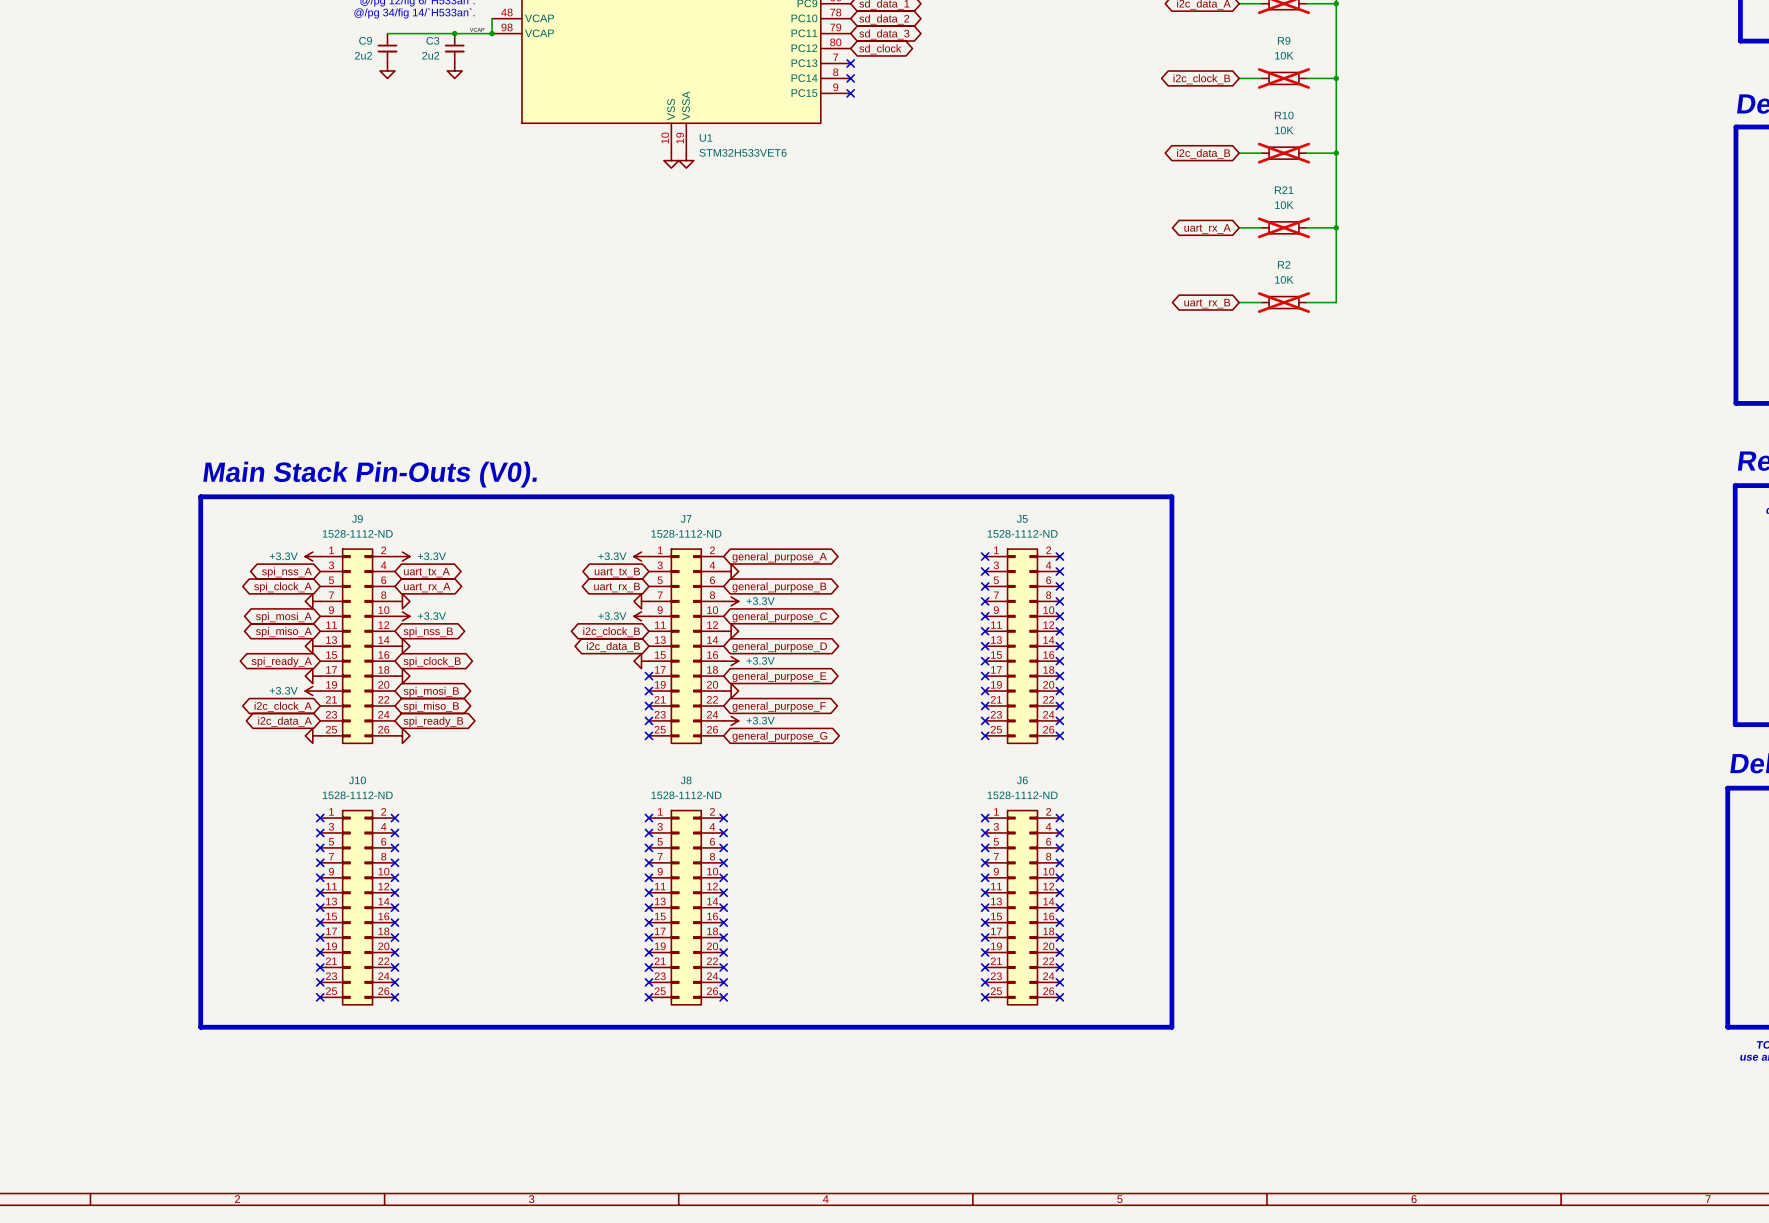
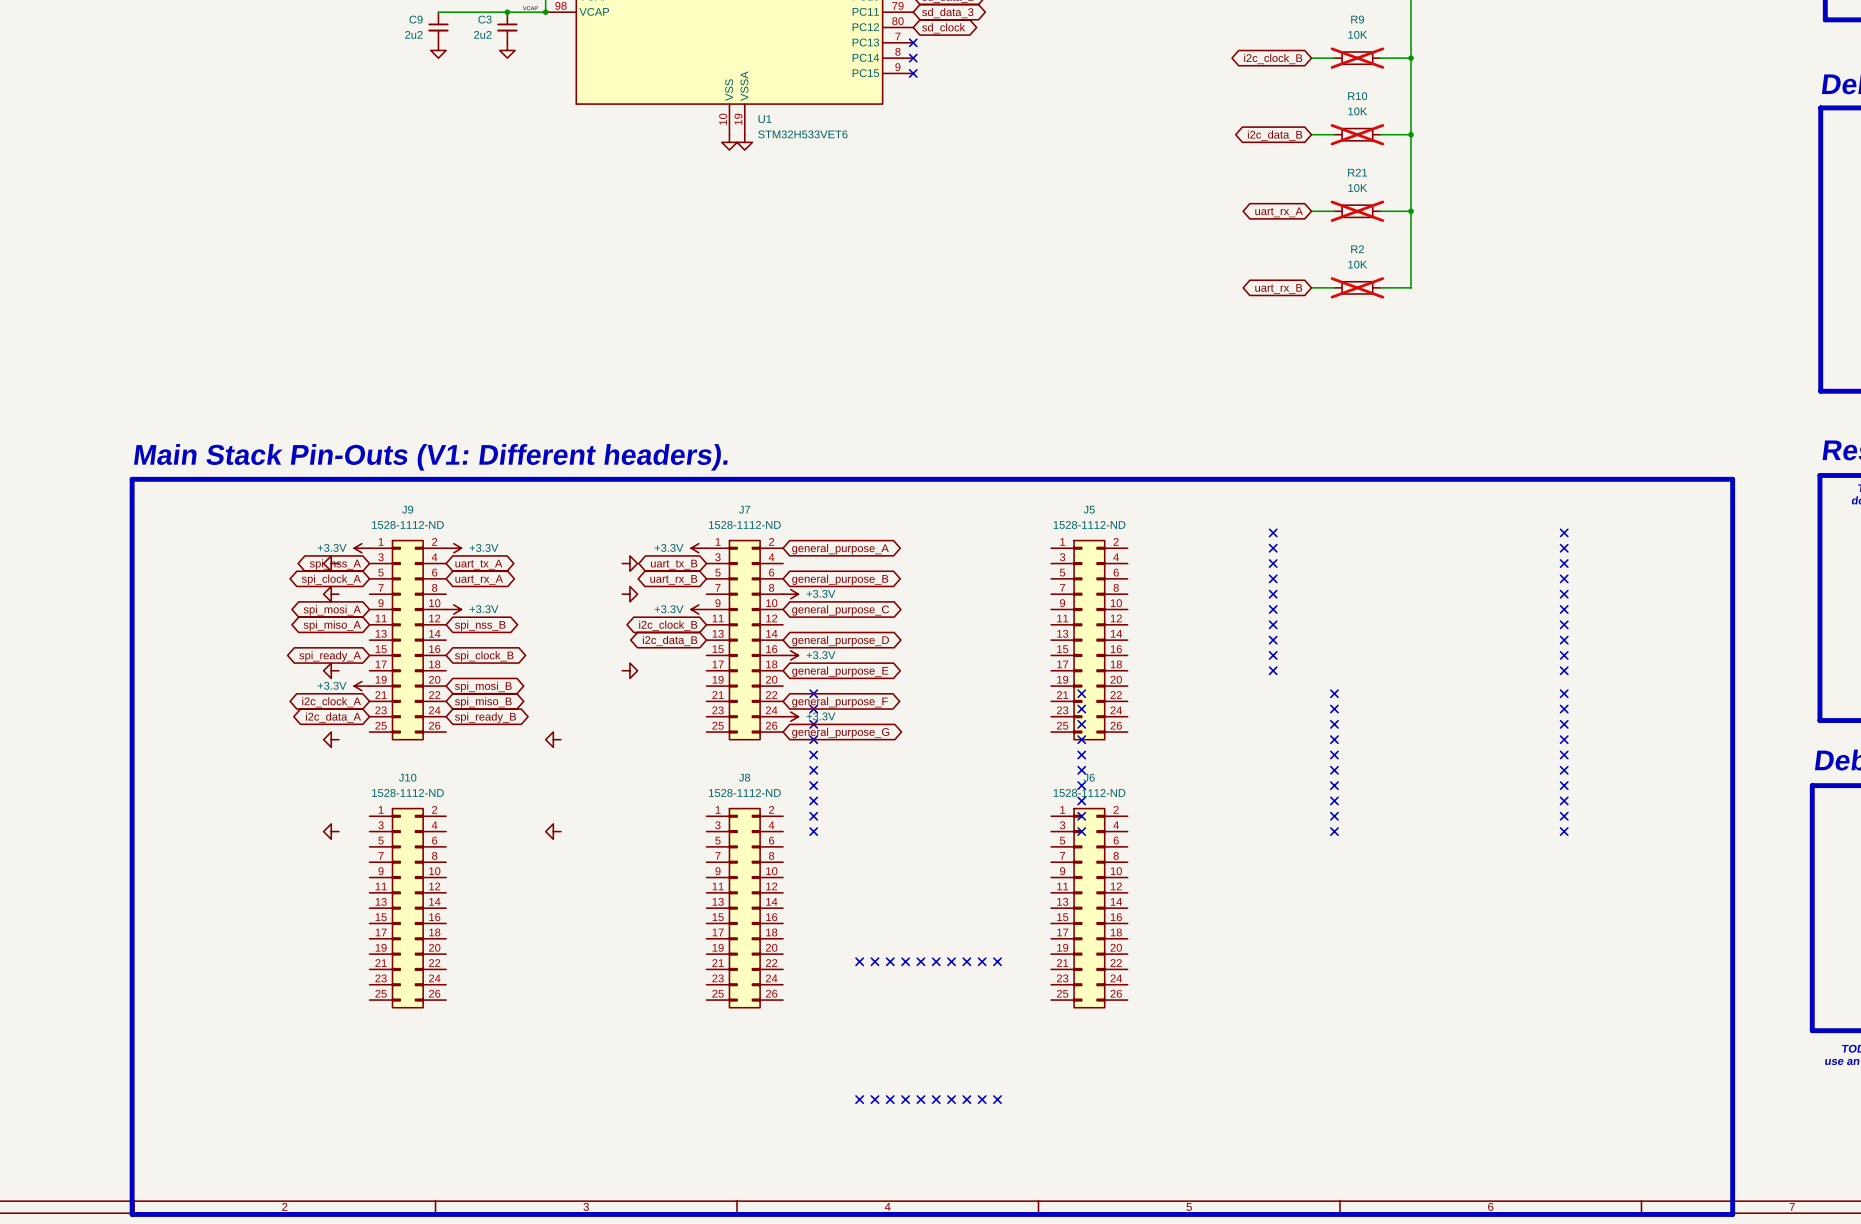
text: Main Stack Pin-Outs (V0). (370, 474) -> Main Stack Pin-Outs (V1: Different headers). (430, 457)
line: none -> (132, 479) (1732, 479) (1732, 1214) (132, 1214) (132, 479)
line: (200, 496) (1171, 496) (1171, 1027) (200, 1027) (200, 496) -> none
no-connect mark: none -> (1273, 532)
no-connect mark: none -> (1564, 532)
no-connect mark: (985, 556) -> none
no-connect mark: (1059, 556) -> none
no-connect mark: none -> (1273, 548)
no-connect mark: none -> (1564, 548)
power symbol: none -> (331, 563)
power symbol: none -> (629, 563)
power symbol: (731, 571) -> none
no-connect mark: (985, 571) -> none
no-connect mark: (1059, 571) -> none
no-connect mark: none -> (1273, 563)
no-connect mark: none -> (1564, 563)
no-connect mark: (985, 586) -> none
no-connect mark: (1059, 586) -> none
no-connect mark: none -> (1273, 578)
no-connect mark: none -> (1564, 578)
power symbol: none -> (331, 594)
power symbol: (312, 601) -> none
power symbol: (402, 601) -> none
power symbol: none -> (629, 594)
power symbol: (641, 601) -> none
no-connect mark: (985, 601) -> none
no-connect mark: (1059, 601) -> none
no-connect mark: none -> (1273, 594)
no-connect mark: none -> (1564, 594)
no-connect mark: (985, 616) -> none
no-connect mark: (1059, 616) -> none
no-connect mark: none -> (1273, 609)
no-connect mark: none -> (1564, 609)
power symbol: (731, 631) -> none
no-connect mark: (985, 631) -> none
no-connect mark: (1059, 631) -> none
no-connect mark: none -> (1273, 624)
no-connect mark: none -> (1564, 624)
power symbol: (312, 646) -> none
power symbol: (402, 646) -> none
no-connect mark: (985, 646) -> none
no-connect mark: (1059, 646) -> none
no-connect mark: none -> (1273, 640)
no-connect mark: none -> (1564, 640)
power symbol: (641, 661) -> none
no-connect mark: (985, 661) -> none
no-connect mark: (1059, 661) -> none
no-connect mark: none -> (1273, 655)
no-connect mark: none -> (1564, 655)
power symbol: none -> (331, 670)
power symbol: (312, 676) -> none
power symbol: (402, 676) -> none
power symbol: none -> (629, 670)
no-connect mark: (648, 676) -> none
no-connect mark: (985, 676) -> none
no-connect mark: (1059, 676) -> none
no-connect mark: none -> (1273, 670)
no-connect mark: none -> (1564, 670)
no-connect mark: (648, 691) -> none
power symbol: (731, 691) -> none
no-connect mark: (985, 691) -> none
no-connect mark: (1059, 691) -> none
no-connect mark: none -> (813, 693)
no-connect mark: none -> (1081, 693)
no-connect mark: none -> (1334, 693)
no-connect mark: none -> (1564, 693)
no-connect mark: (648, 705) -> none
no-connect mark: (985, 705) -> none
no-connect mark: (1059, 705) -> none
no-connect mark: none -> (813, 709)
no-connect mark: none -> (1081, 709)
no-connect mark: none -> (1334, 709)
no-connect mark: none -> (1564, 709)
no-connect mark: (648, 720) -> none
no-connect mark: (985, 720) -> none
no-connect mark: (1059, 720) -> none
no-connect mark: none -> (813, 724)
no-connect mark: none -> (1081, 724)
no-connect mark: none -> (1334, 724)
no-connect mark: none -> (1564, 724)
power symbol position: (312, 735) -> (331, 739)
power symbol: (402, 735) -> none
no-connect mark: (648, 735) -> none
no-connect mark: (985, 735) -> none
no-connect mark: (1059, 735) -> none
power symbol: none -> (553, 739)
no-connect mark: none -> (813, 739)
no-connect mark: none -> (1081, 739)
no-connect mark: none -> (1334, 739)
no-connect mark: none -> (1564, 739)
no-connect mark: none -> (813, 754)
no-connect mark: none -> (1081, 754)
no-connect mark: none -> (1334, 754)
no-connect mark: none -> (1564, 754)
no-connect mark: none -> (813, 770)
no-connect mark: none -> (1081, 770)
no-connect mark: none -> (1334, 770)
no-connect mark: none -> (1564, 770)
no-connect mark: none -> (813, 785)
no-connect mark: none -> (1081, 785)
no-connect mark: none -> (1334, 785)
no-connect mark: none -> (1564, 785)
no-connect mark: none -> (813, 800)
no-connect mark: none -> (1081, 800)
no-connect mark: none -> (1334, 800)
no-connect mark: none -> (1564, 800)
no-connect mark: (320, 818) -> none
no-connect mark: (394, 818) -> none
no-connect mark: (648, 818) -> none
no-connect mark: (723, 818) -> none
no-connect mark: none -> (813, 816)
no-connect mark: (985, 818) -> none
no-connect mark: none -> (1081, 816)
no-connect mark: (1059, 818) -> none
no-connect mark: none -> (1334, 816)
no-connect mark: none -> (1564, 816)
power symbol: none -> (331, 831)
no-connect mark: (320, 832) -> none
no-connect mark: (394, 832) -> none
power symbol: none -> (553, 831)
no-connect mark: (648, 832) -> none
no-connect mark: (723, 832) -> none
no-connect mark: none -> (813, 831)
no-connect mark: (985, 832) -> none
no-connect mark: none -> (1081, 831)
no-connect mark: (1059, 832) -> none
no-connect mark: none -> (1334, 831)
no-connect mark: none -> (1564, 831)
no-connect mark: (320, 847) -> none
no-connect mark: (394, 847) -> none
no-connect mark: (648, 847) -> none
no-connect mark: (723, 847) -> none
no-connect mark: (985, 847) -> none
no-connect mark: (1059, 847) -> none
no-connect mark: (320, 862) -> none
no-connect mark: (394, 862) -> none
no-connect mark: (648, 862) -> none
no-connect mark: (723, 862) -> none
no-connect mark: (985, 862) -> none
no-connect mark: (1059, 862) -> none
no-connect mark: (320, 877) -> none
no-connect mark: (394, 877) -> none
no-connect mark: (648, 877) -> none
no-connect mark: (723, 877) -> none
no-connect mark: (985, 877) -> none
no-connect mark: (1059, 877) -> none
no-connect mark: (320, 892) -> none
no-connect mark: (394, 892) -> none
no-connect mark: (648, 892) -> none
no-connect mark: (723, 892) -> none
no-connect mark: (985, 892) -> none
no-connect mark: (1059, 892) -> none
no-connect mark: (320, 907) -> none
no-connect mark: (394, 907) -> none
no-connect mark: (648, 907) -> none
no-connect mark: (723, 907) -> none
no-connect mark: (985, 907) -> none
no-connect mark: (1059, 907) -> none
no-connect mark: (320, 922) -> none
no-connect mark: (394, 922) -> none
no-connect mark: (648, 922) -> none
no-connect mark: (723, 922) -> none
no-connect mark: (985, 922) -> none
no-connect mark: (1059, 922) -> none
no-connect mark: (320, 937) -> none
no-connect mark: (394, 937) -> none
no-connect mark: (648, 937) -> none
no-connect mark: (723, 937) -> none
no-connect mark: (985, 937) -> none
no-connect mark: (1059, 937) -> none
no-connect mark: (320, 952) -> none
no-connect mark: (394, 952) -> none
no-connect mark: (648, 952) -> none
no-connect mark: (723, 952) -> none
no-connect mark: (985, 952) -> none
no-connect mark: (1059, 952) -> none
no-connect mark: none -> (859, 961)
no-connect mark: none -> (874, 961)
no-connect mark: none -> (890, 961)
no-connect mark: none -> (905, 961)
no-connect mark: none -> (920, 961)
no-connect mark: none -> (936, 961)
no-connect mark: none -> (951, 961)
no-connect mark: none -> (966, 961)
no-connect mark: none -> (982, 961)
no-connect mark: none -> (997, 961)
no-connect mark: (320, 967) -> none
no-connect mark: (394, 967) -> none
no-connect mark: (648, 967) -> none
no-connect mark: (723, 967) -> none
no-connect mark: (985, 967) -> none
no-connect mark: (1059, 967) -> none
no-connect mark: (320, 982) -> none
no-connect mark: (394, 982) -> none
no-connect mark: (648, 982) -> none
no-connect mark: (723, 982) -> none
no-connect mark: (985, 982) -> none
no-connect mark: (1059, 982) -> none
no-connect mark: (320, 997) -> none
no-connect mark: (394, 997) -> none
no-connect mark: (648, 997) -> none
no-connect mark: (723, 997) -> none
no-connect mark: (985, 997) -> none
no-connect mark: (1059, 997) -> none
no-connect mark: none -> (859, 1099)
no-connect mark: none -> (874, 1099)
no-connect mark: none -> (890, 1099)
no-connect mark: none -> (905, 1099)
no-connect mark: none -> (920, 1099)
no-connect mark: none -> (936, 1099)
no-connect mark: none -> (951, 1099)
no-connect mark: none -> (966, 1099)
no-connect mark: none -> (982, 1099)
no-connect mark: none -> (997, 1099)

